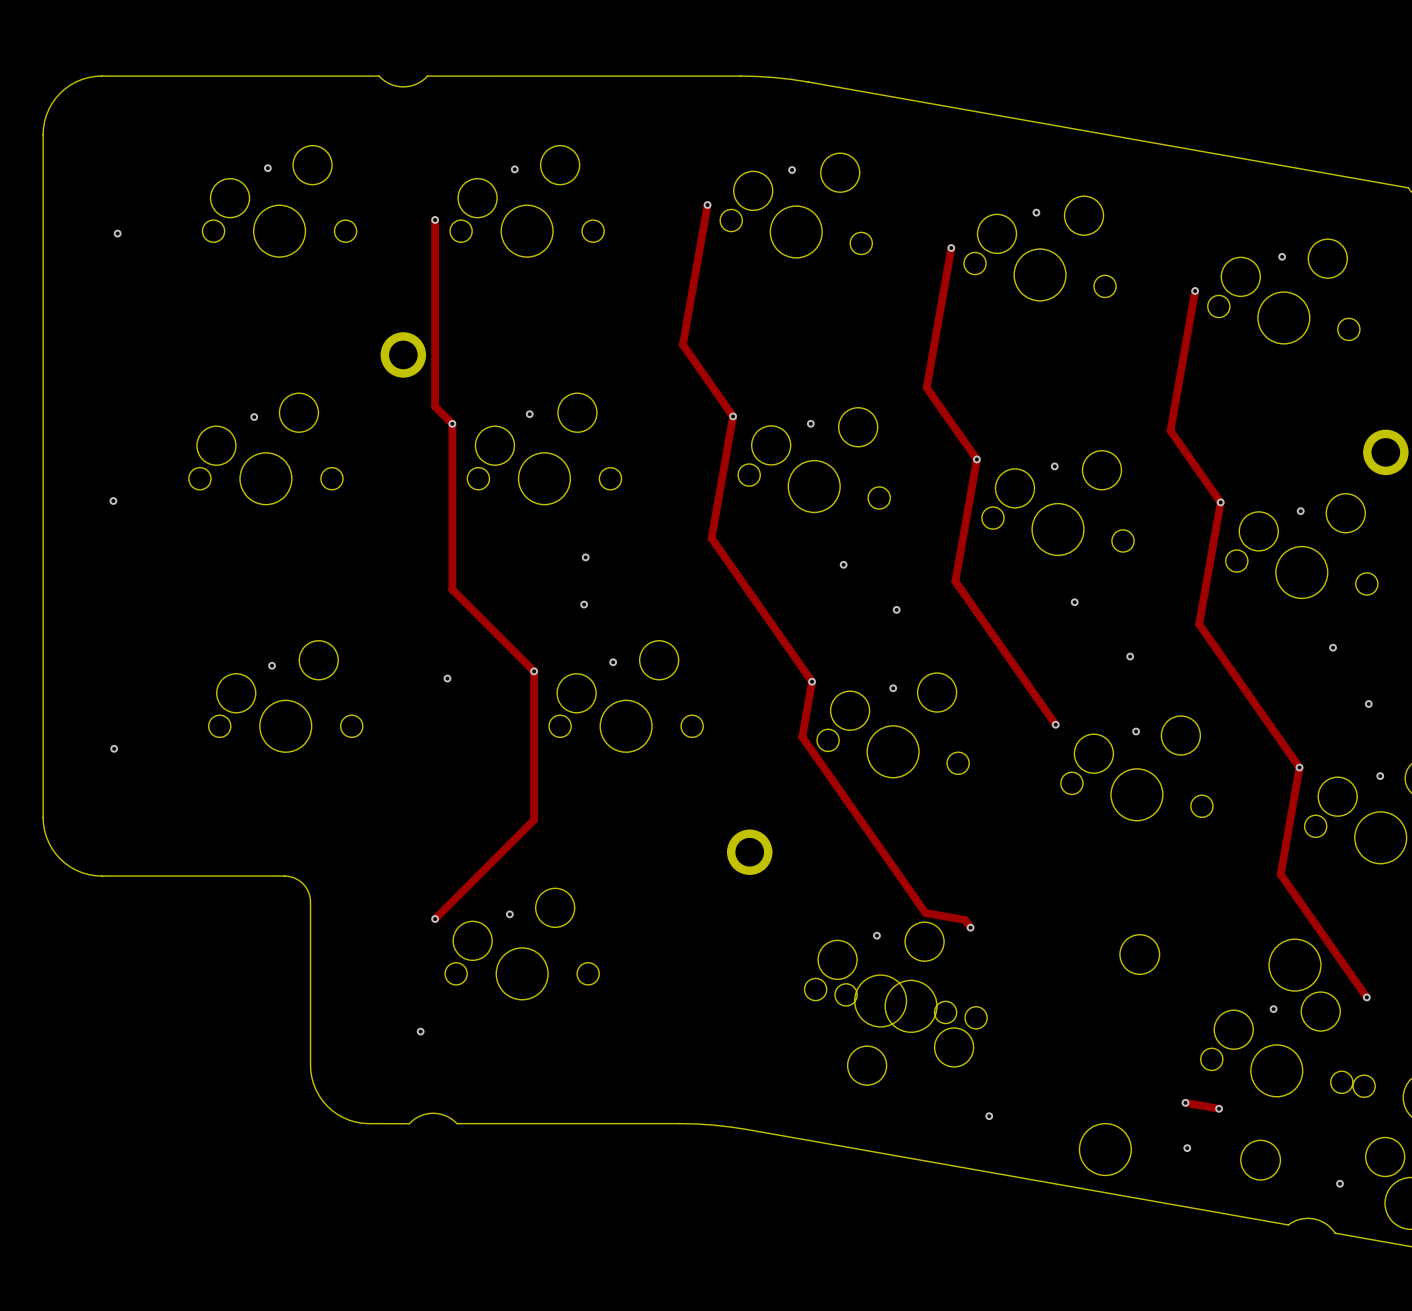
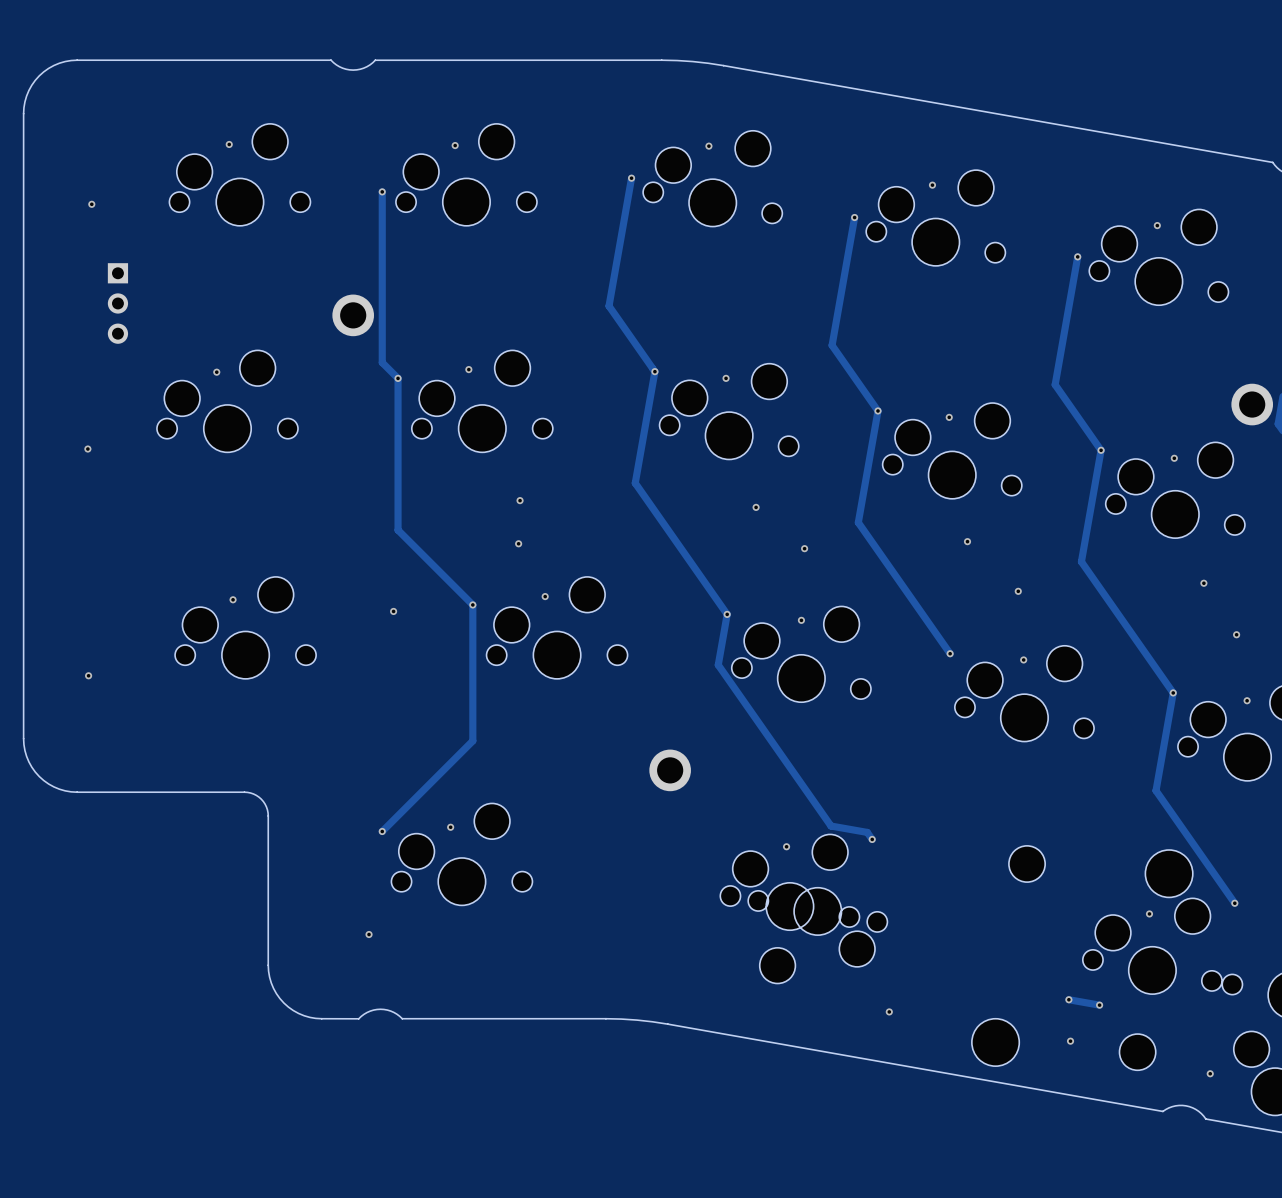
part: none -> (117, 303)

